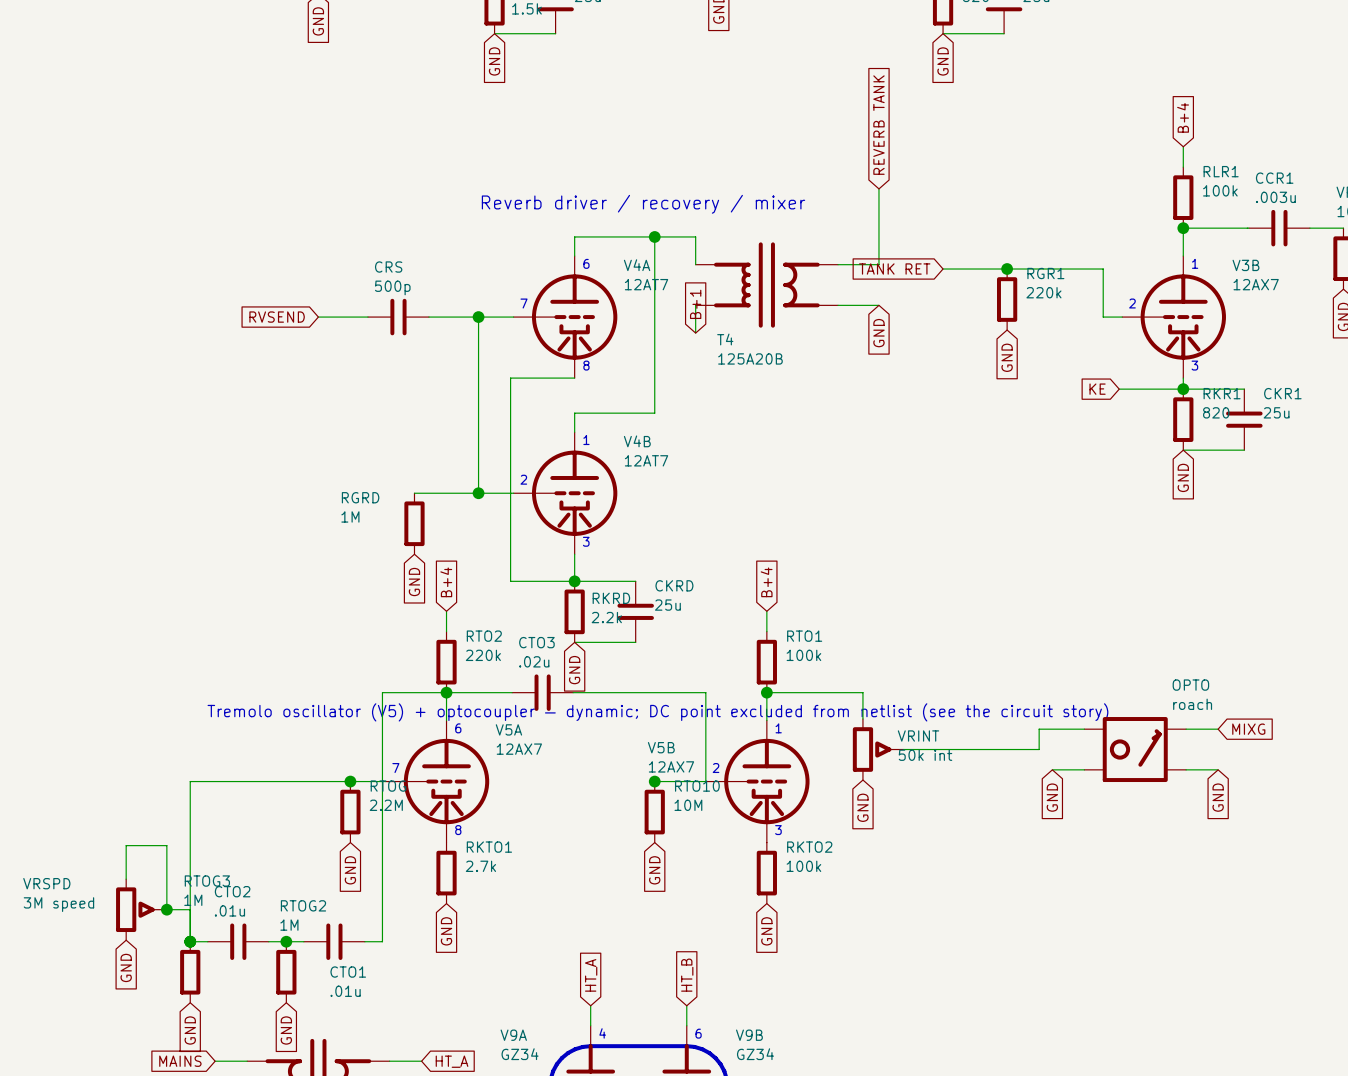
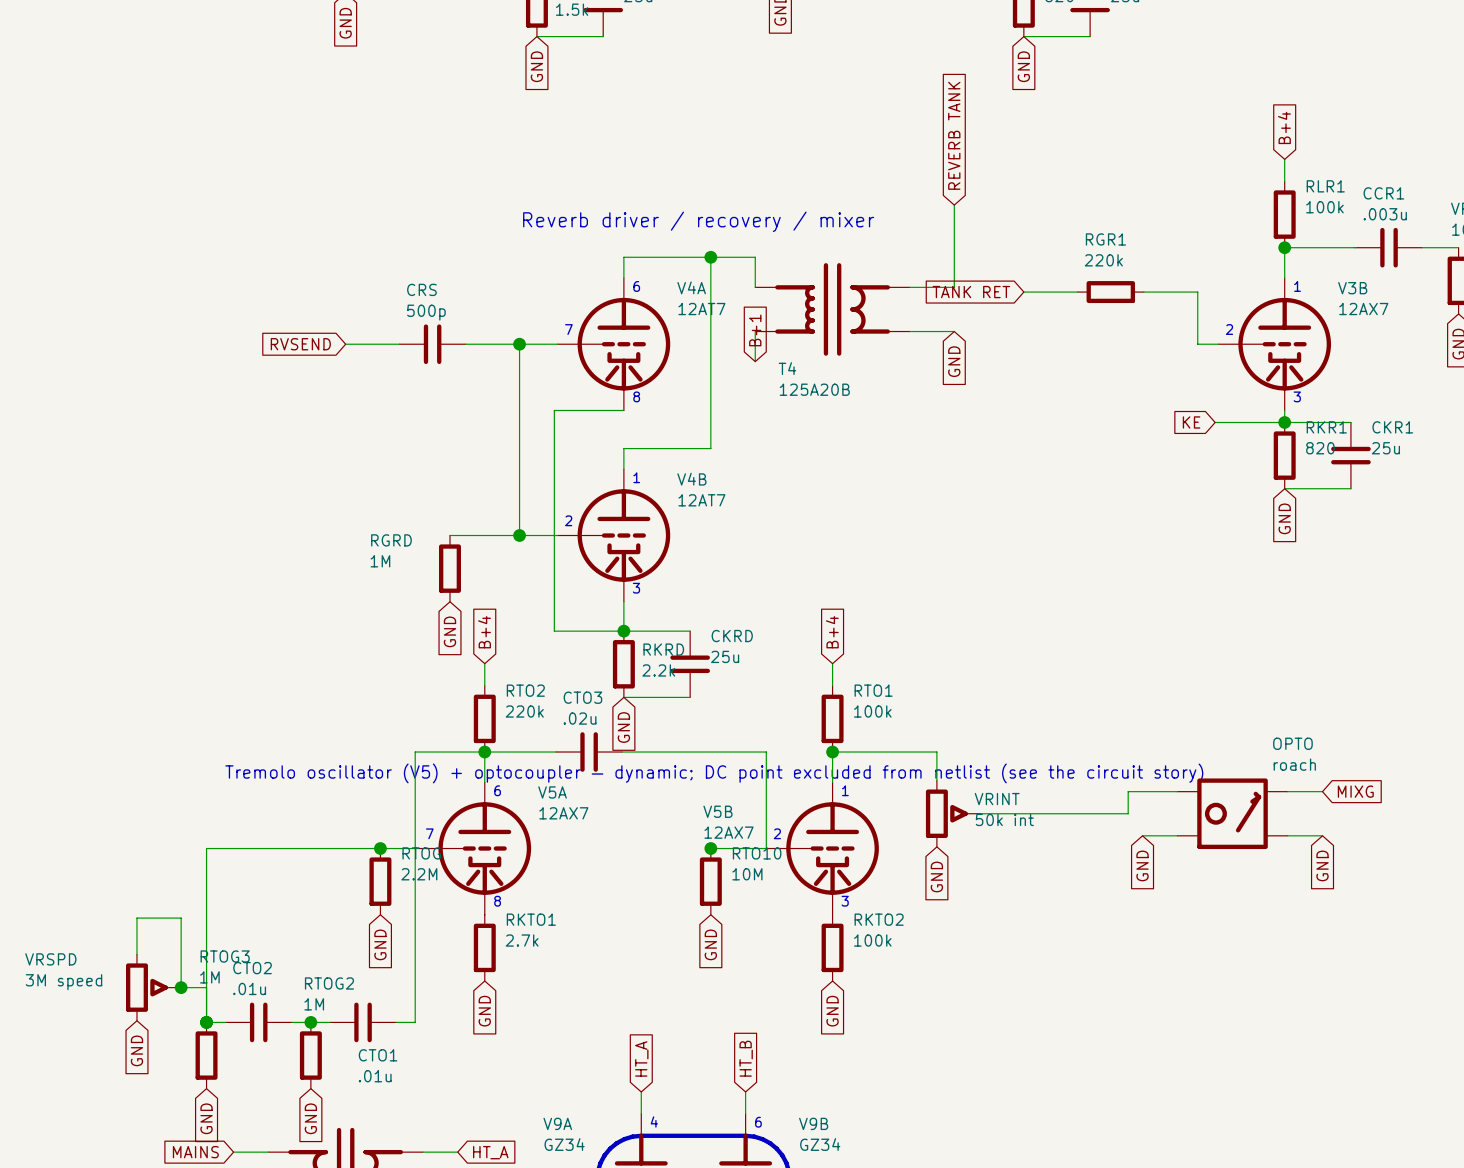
wire: (992, 269) (1053, 269) -> none
junction: (1007, 269) -> none
RGR1 name position: RGR1 (1045, 273) -> RGR1 (1105, 239)
RGR1 value position: 220k (1043, 292) -> 220k (1103, 260)
RGR1 rotation: 0° (1007, 299) -> 90° clockwise (1110, 292)
global label: GND (1007, 357) -> none

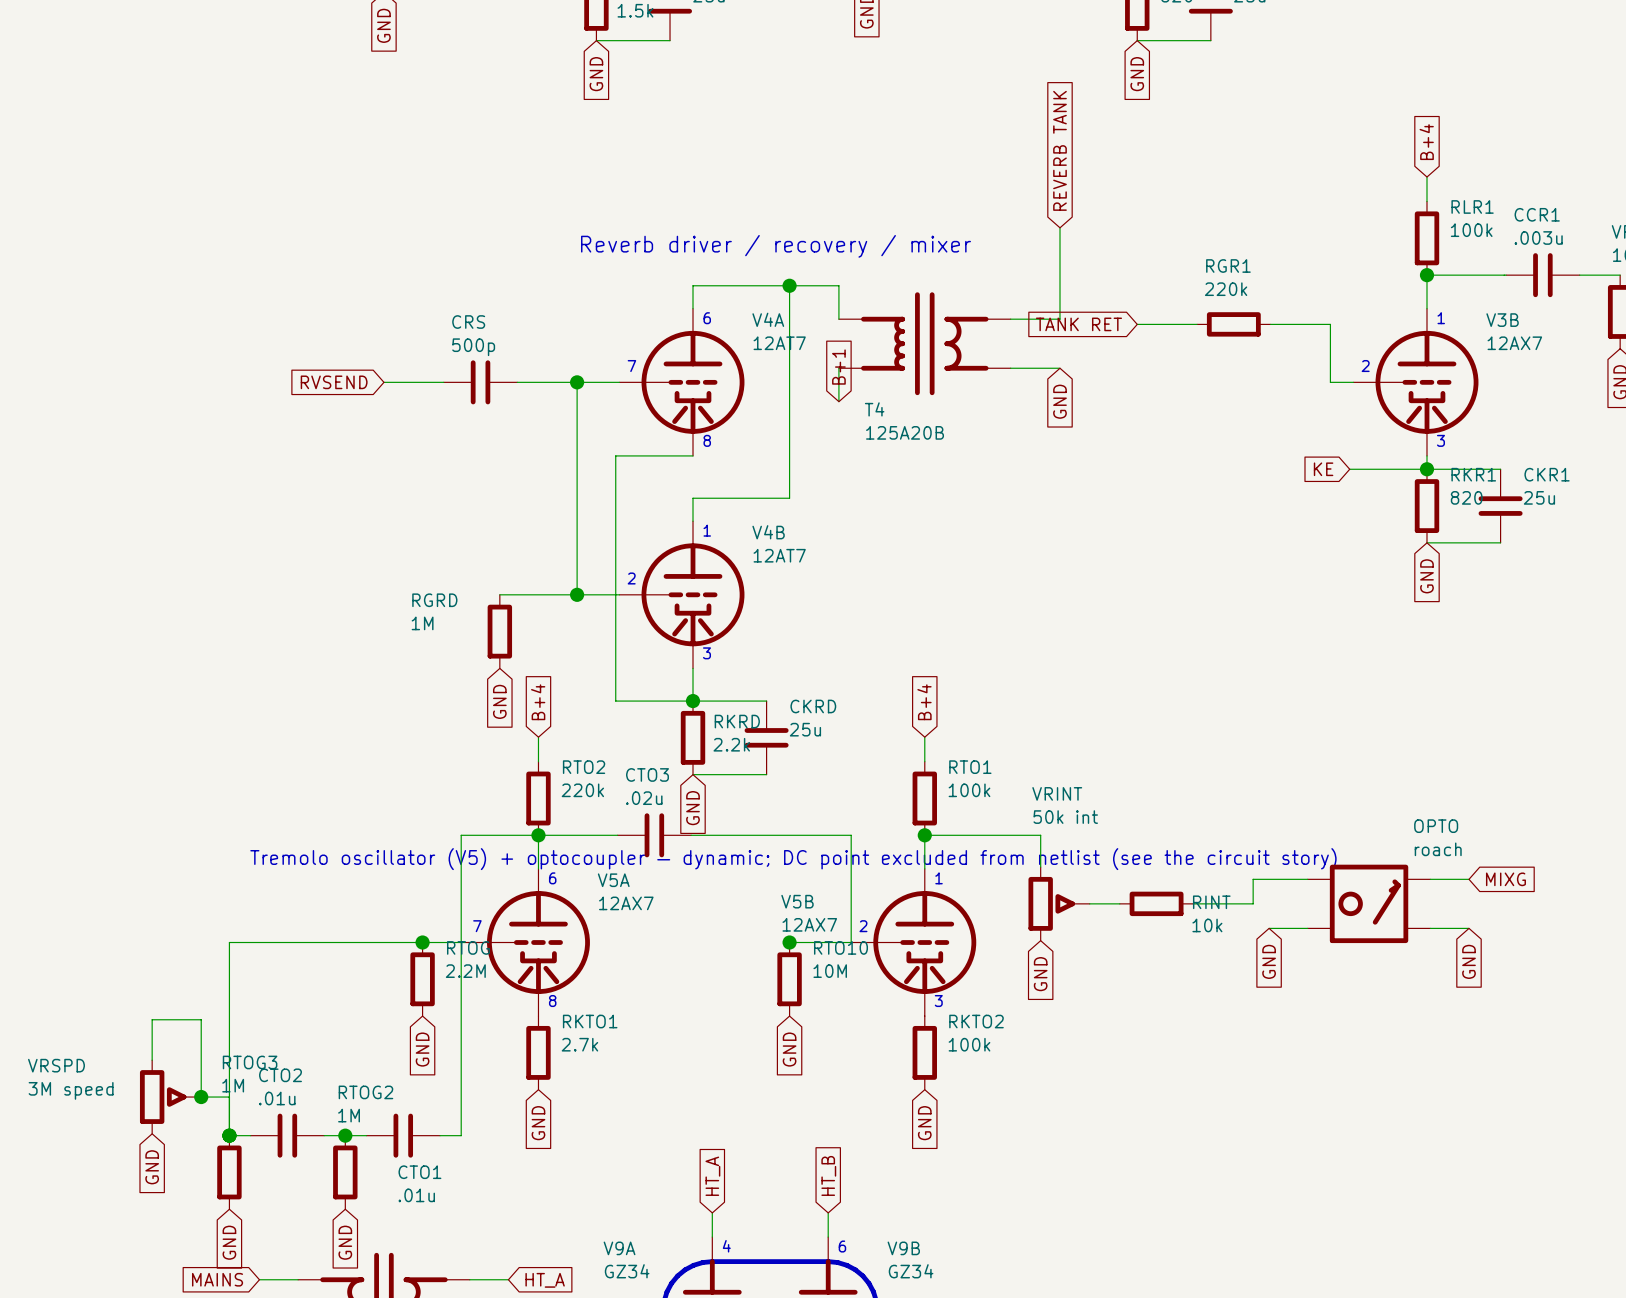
VRINT name position: VRINT (997, 799) -> VRINT (1057, 793)
wire: (1008, 813) (1074, 813) -> none
RINT: none -> 10k (1156, 903)
VRINT value position: 50k int (1004, 819) -> 50k int (1065, 817)

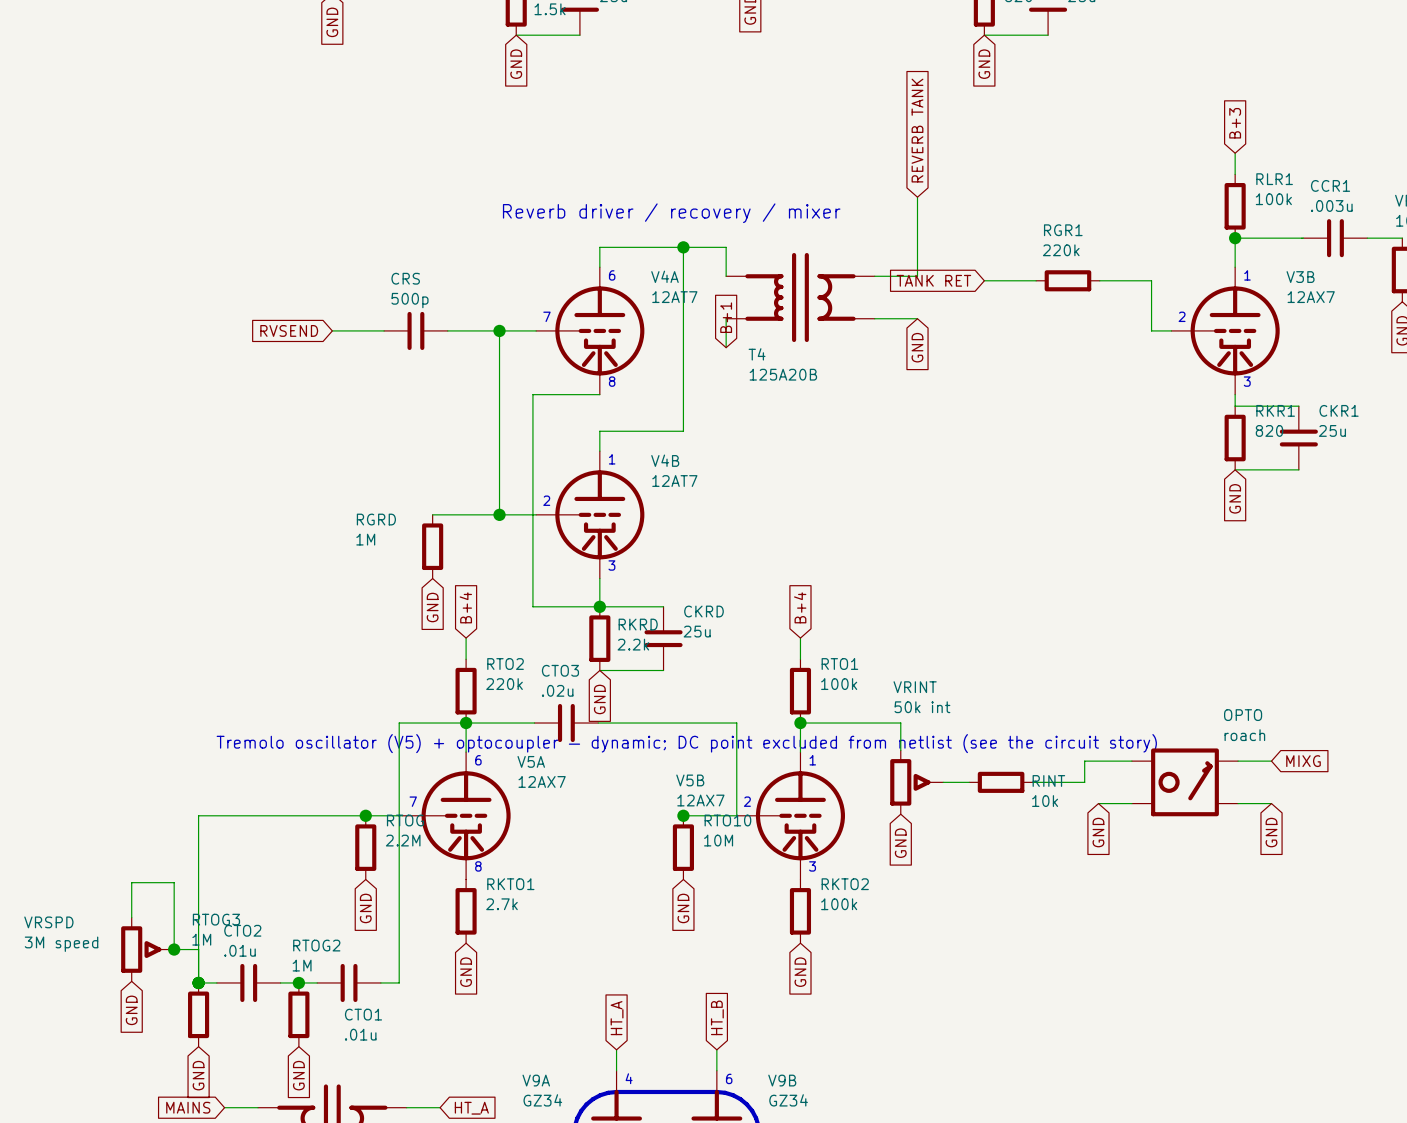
global label: B+4 (1426, 142) -> B+3 (1235, 123)
global label: KE (1323, 469) -> none
wire: (1349, 469) (1426, 469) -> none
junction: (1426, 469) -> none

